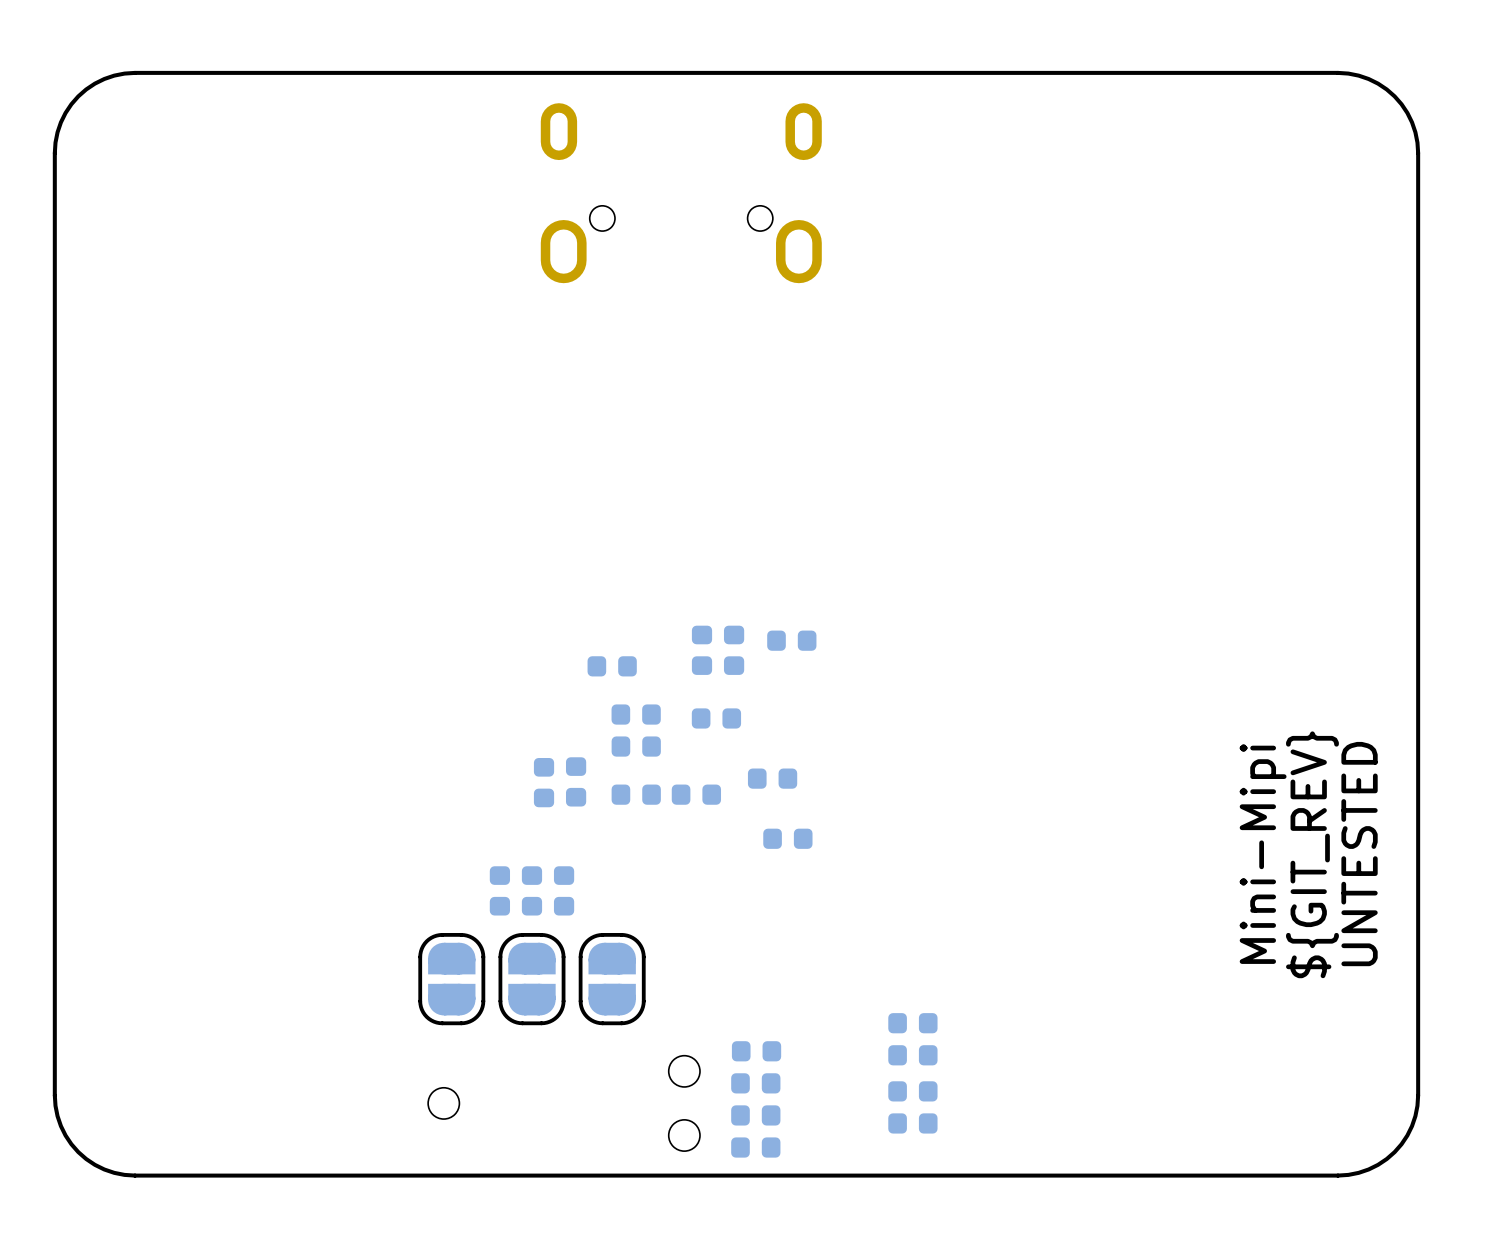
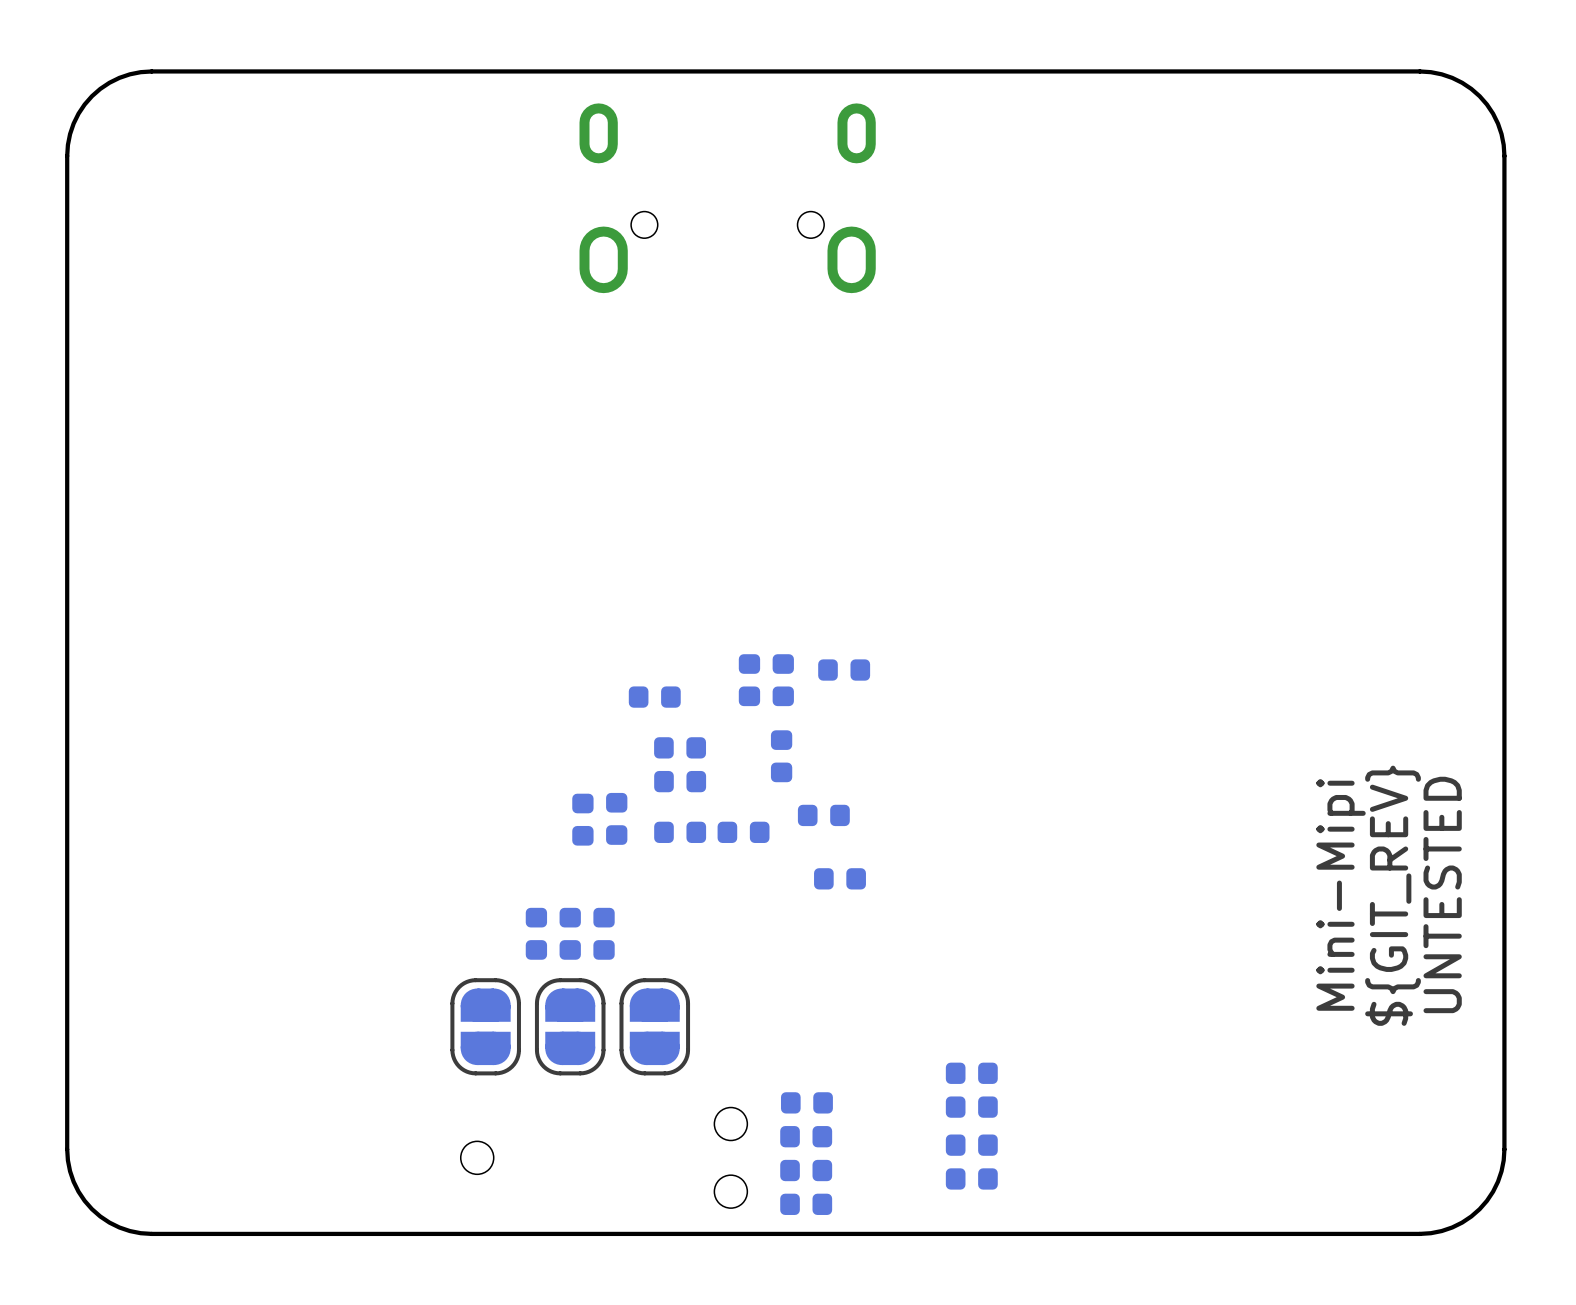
part rotation: 0° (716, 718) -> 90° clockwise (781, 756)

